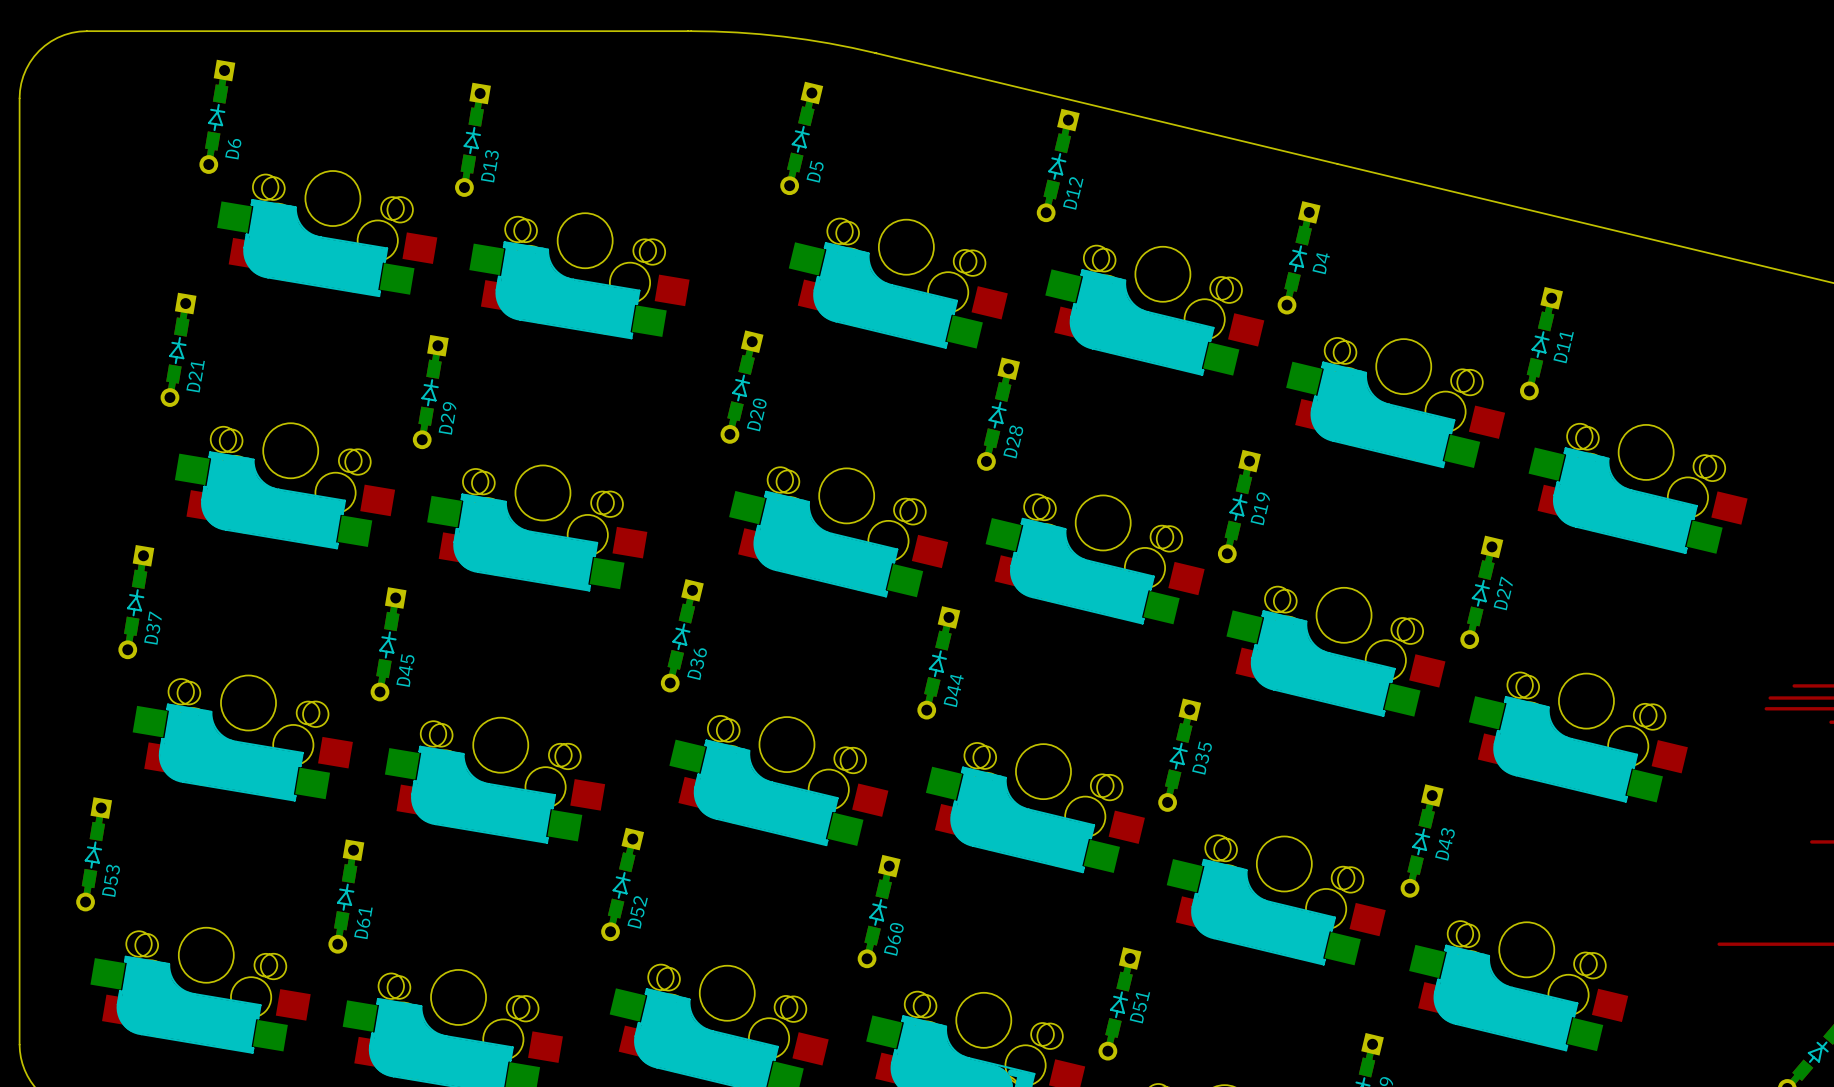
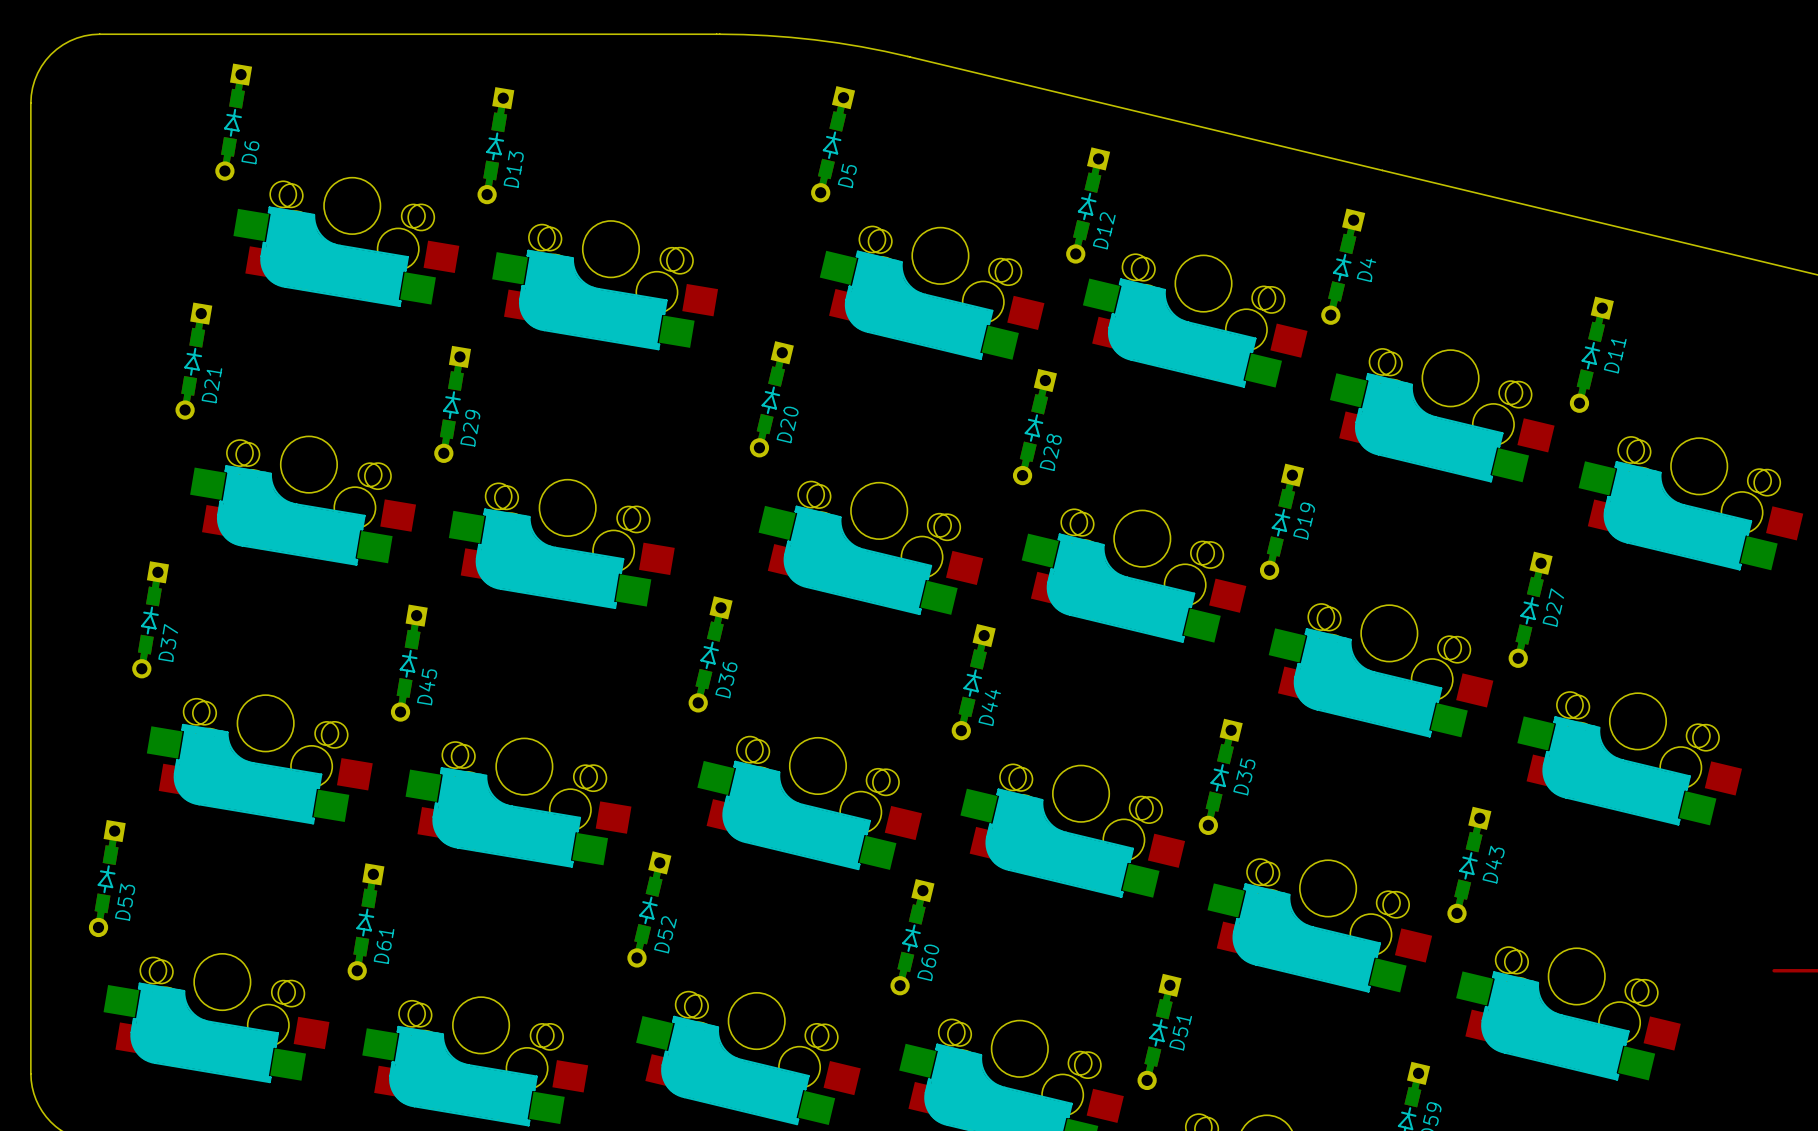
D12 position: (1058, 165) -> (1088, 205)

